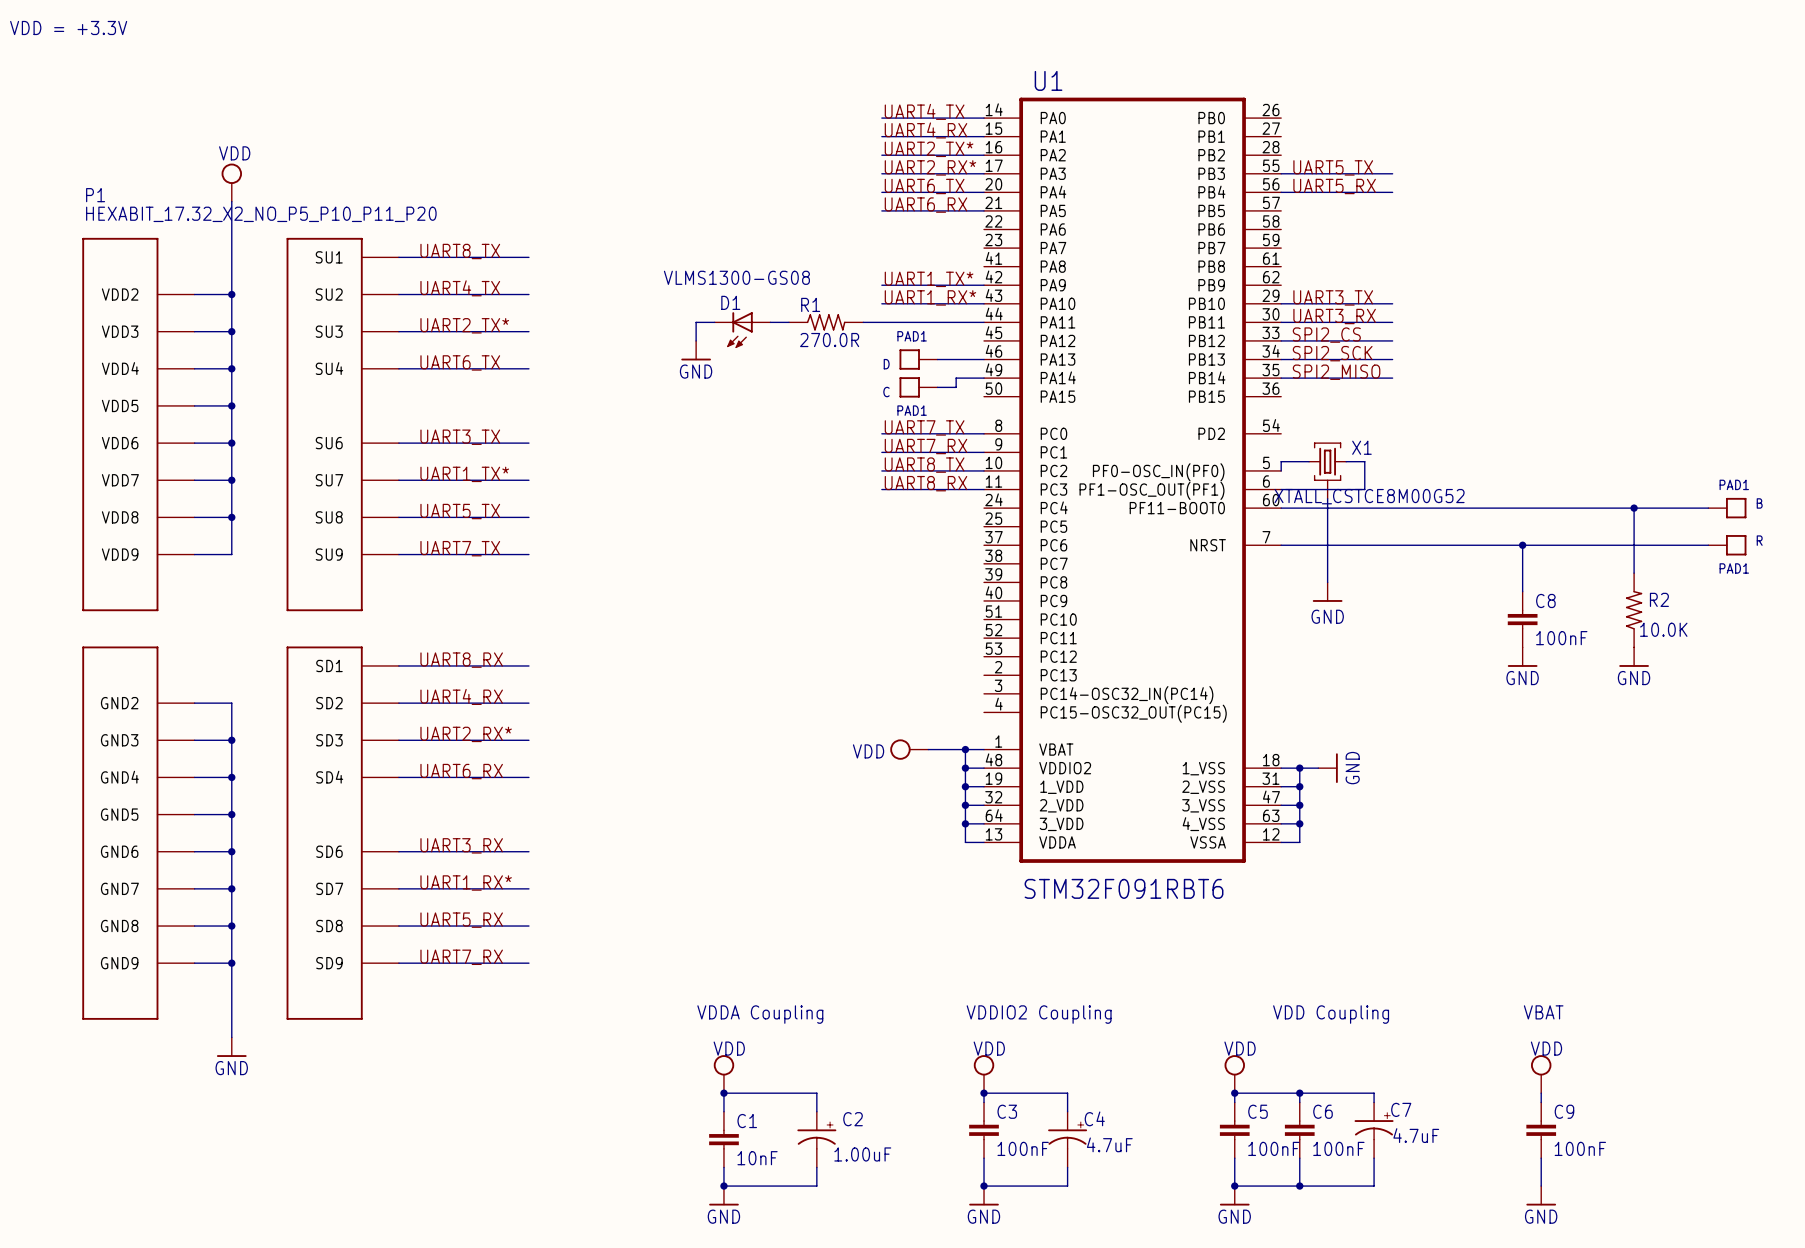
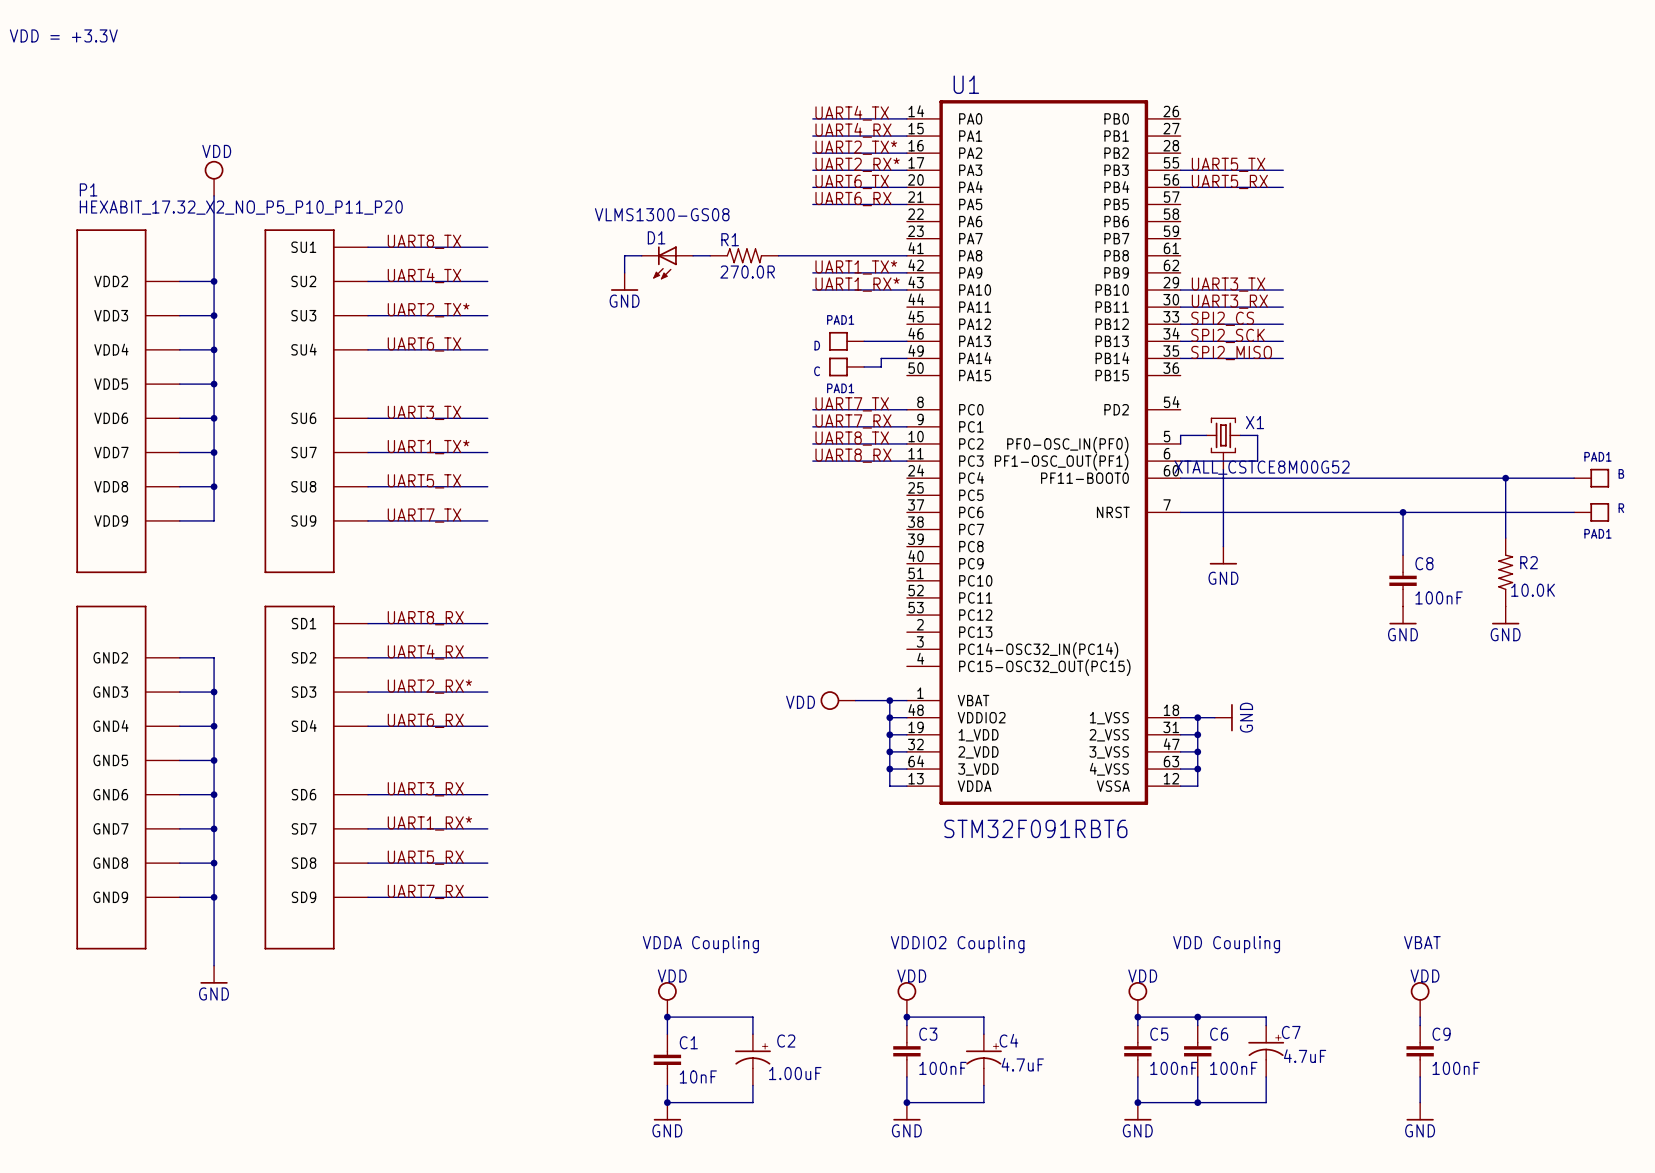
wire: none -> (778, 255) (906, 255)
wire: (714, 322) (696, 322) (696, 340) -> (641, 255) (624, 255) (624, 272)
wire: (770, 322) (788, 322) -> (693, 255) (710, 255)
R1 position: (826, 322) -> (744, 255)
wire: (863, 322) (984, 322) -> none
D1 position: (742, 330) -> (667, 262)
power symbol position: GND (696, 350) -> GND (624, 281)

